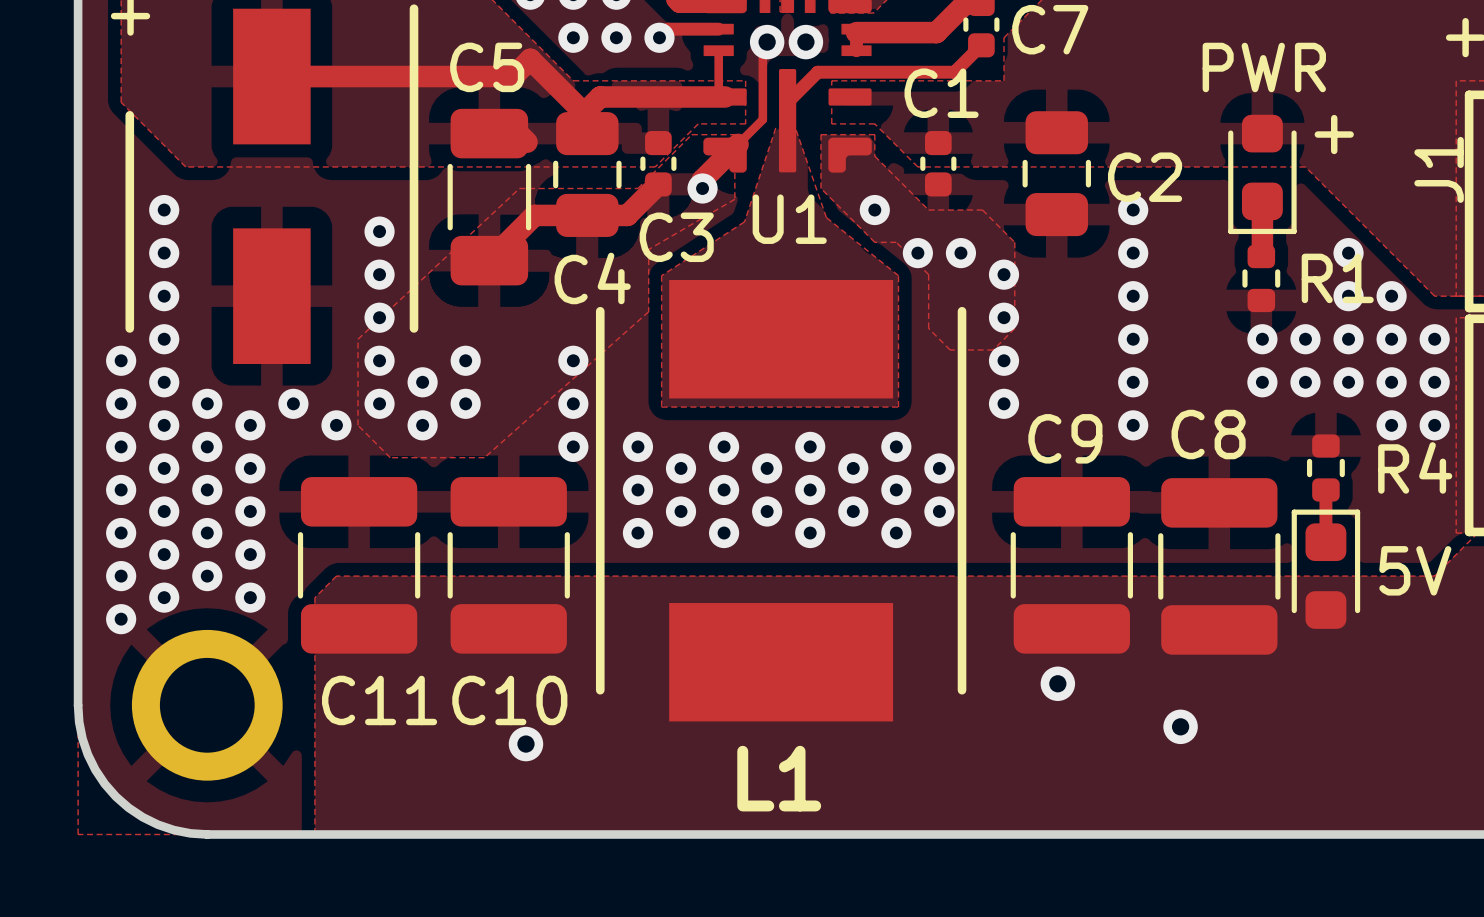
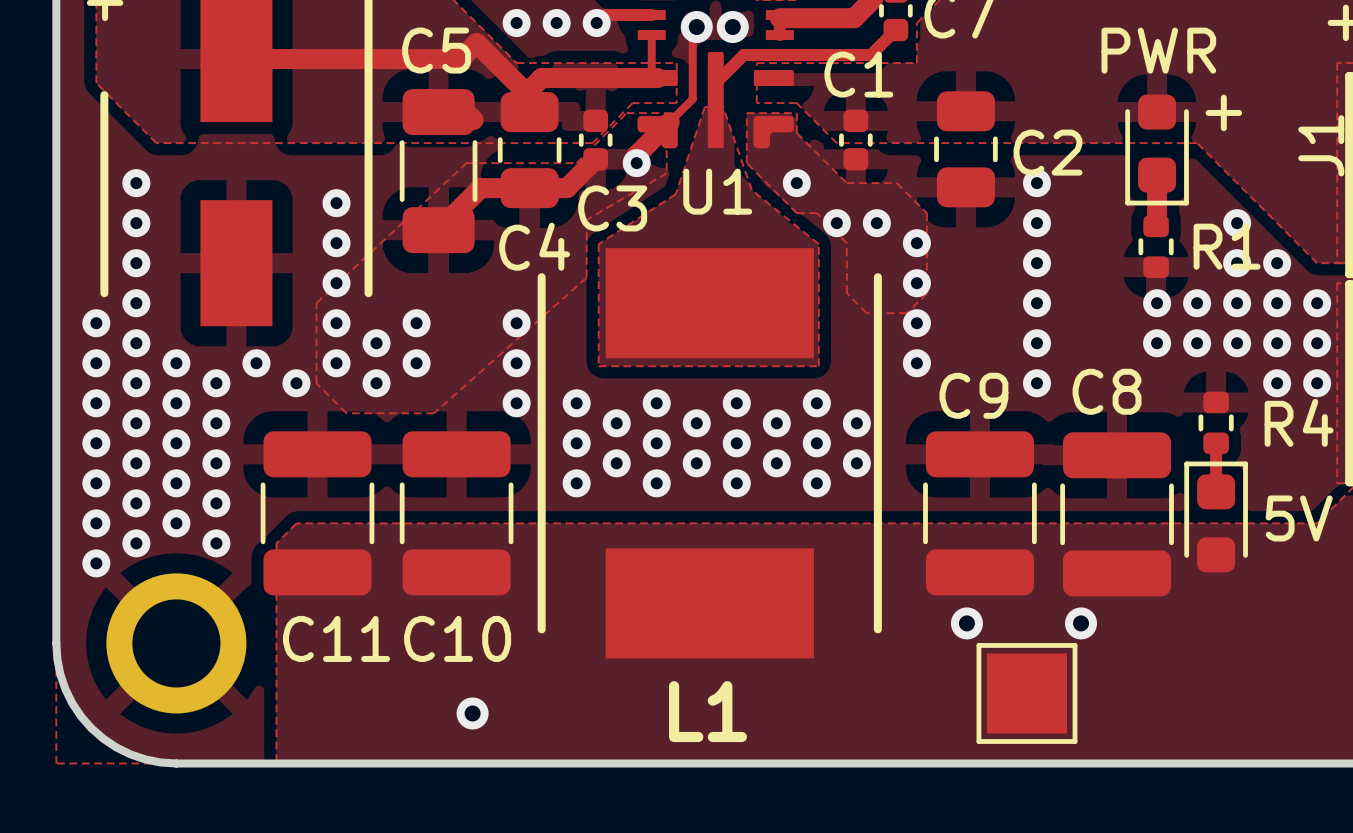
via position: (1180, 726) -> (1081, 623)
via position: (525, 744) -> (472, 713)
part: none -> (1026, 693)

